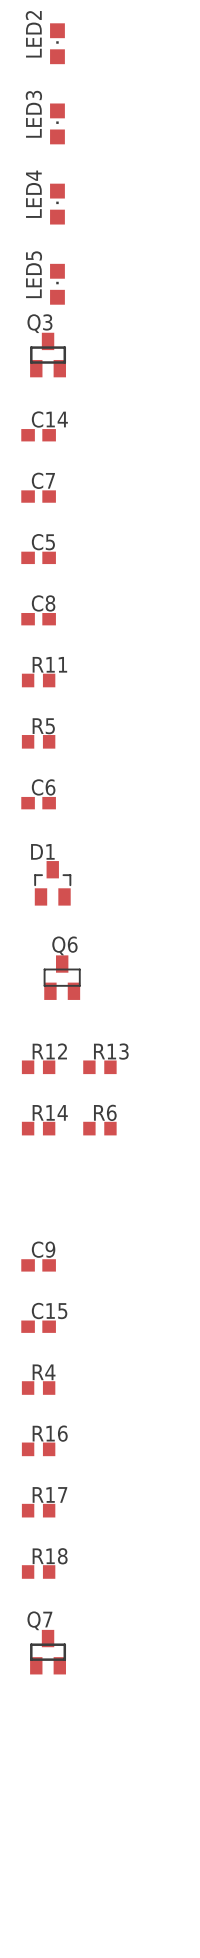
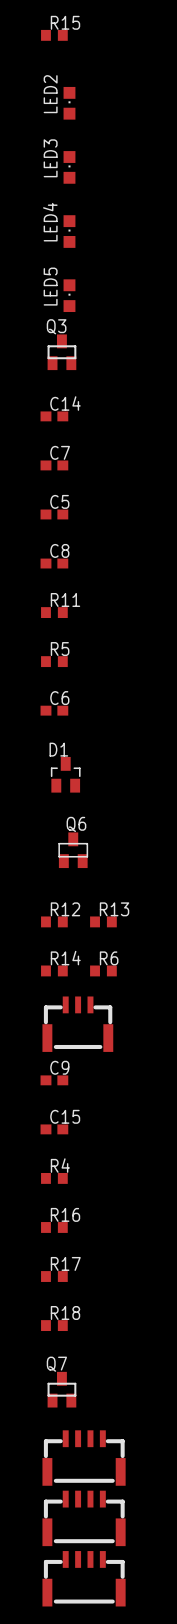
part: none -> (77, 1024)
part: none -> (84, 1458)
part: none -> (84, 1518)
part: none -> (84, 1578)

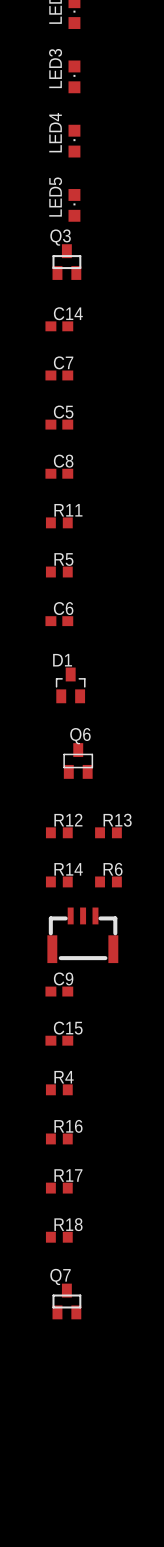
part: (84, 1458) -> none
part: (84, 1518) -> none
part: (84, 1578) -> none

